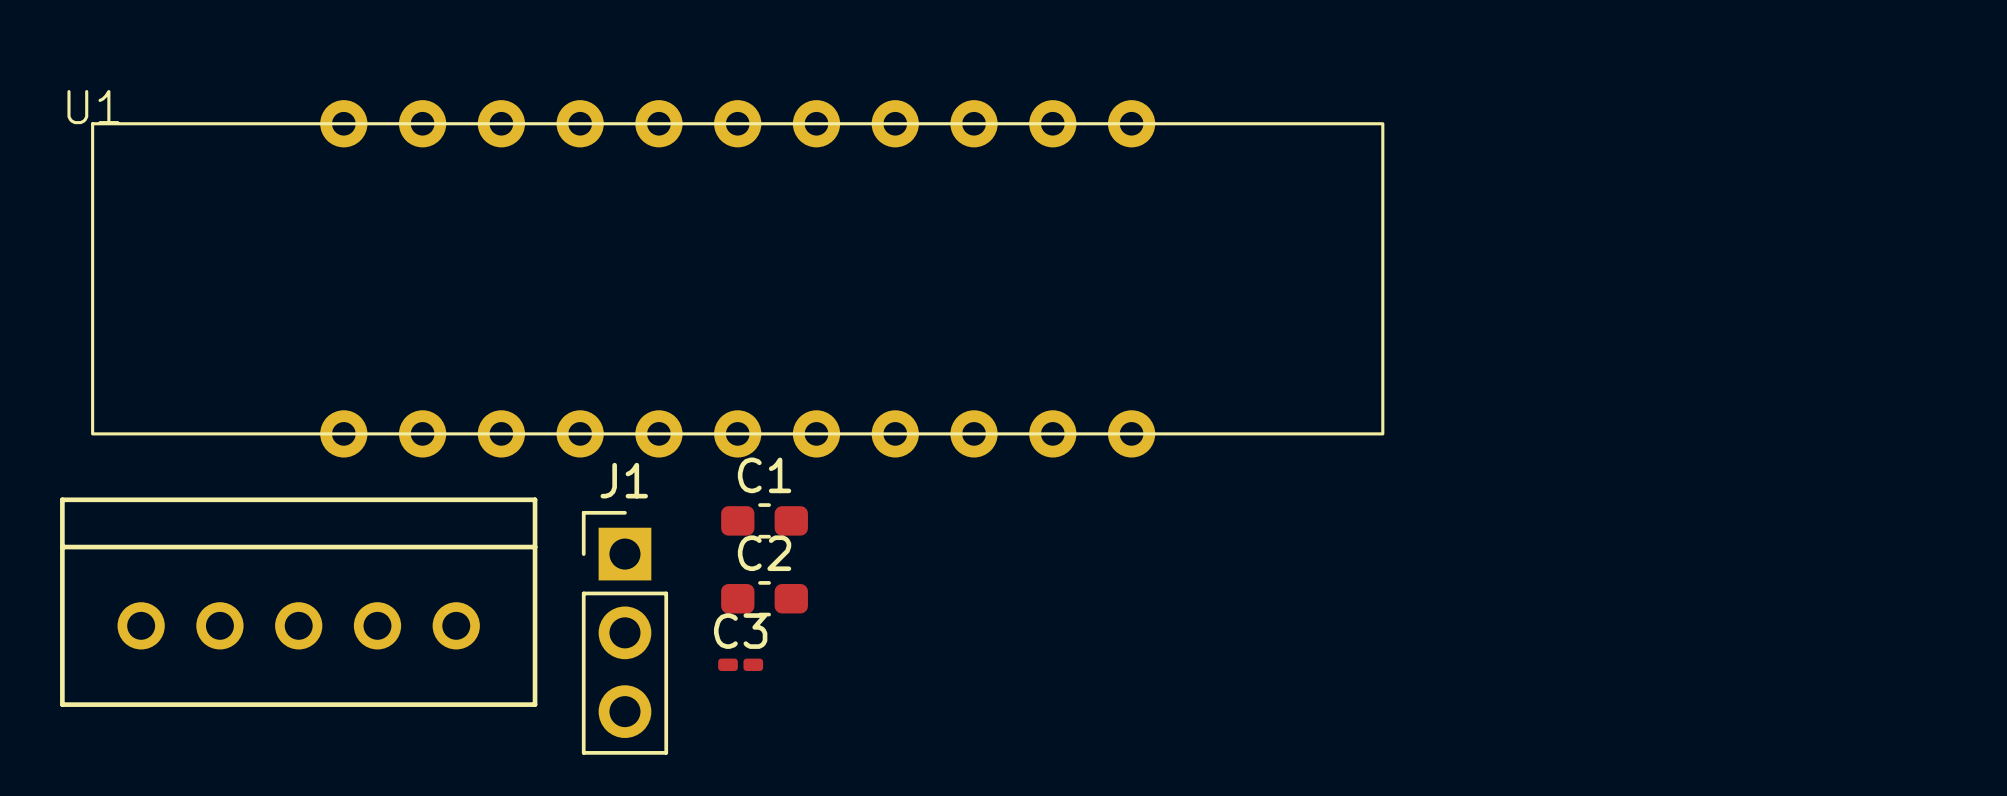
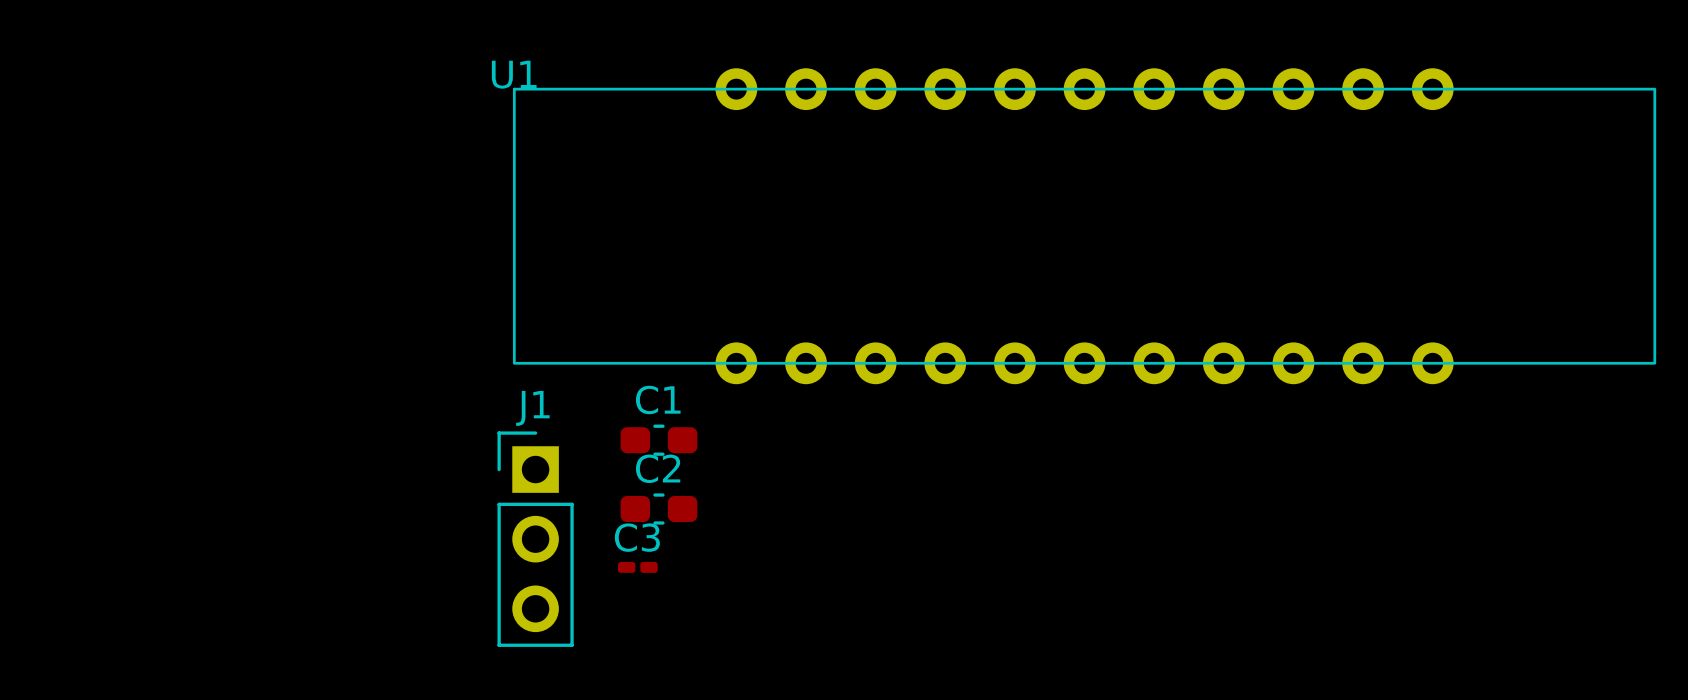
U1 position: (737, 278) -> (1084, 226)
part: (298, 602) -> none

